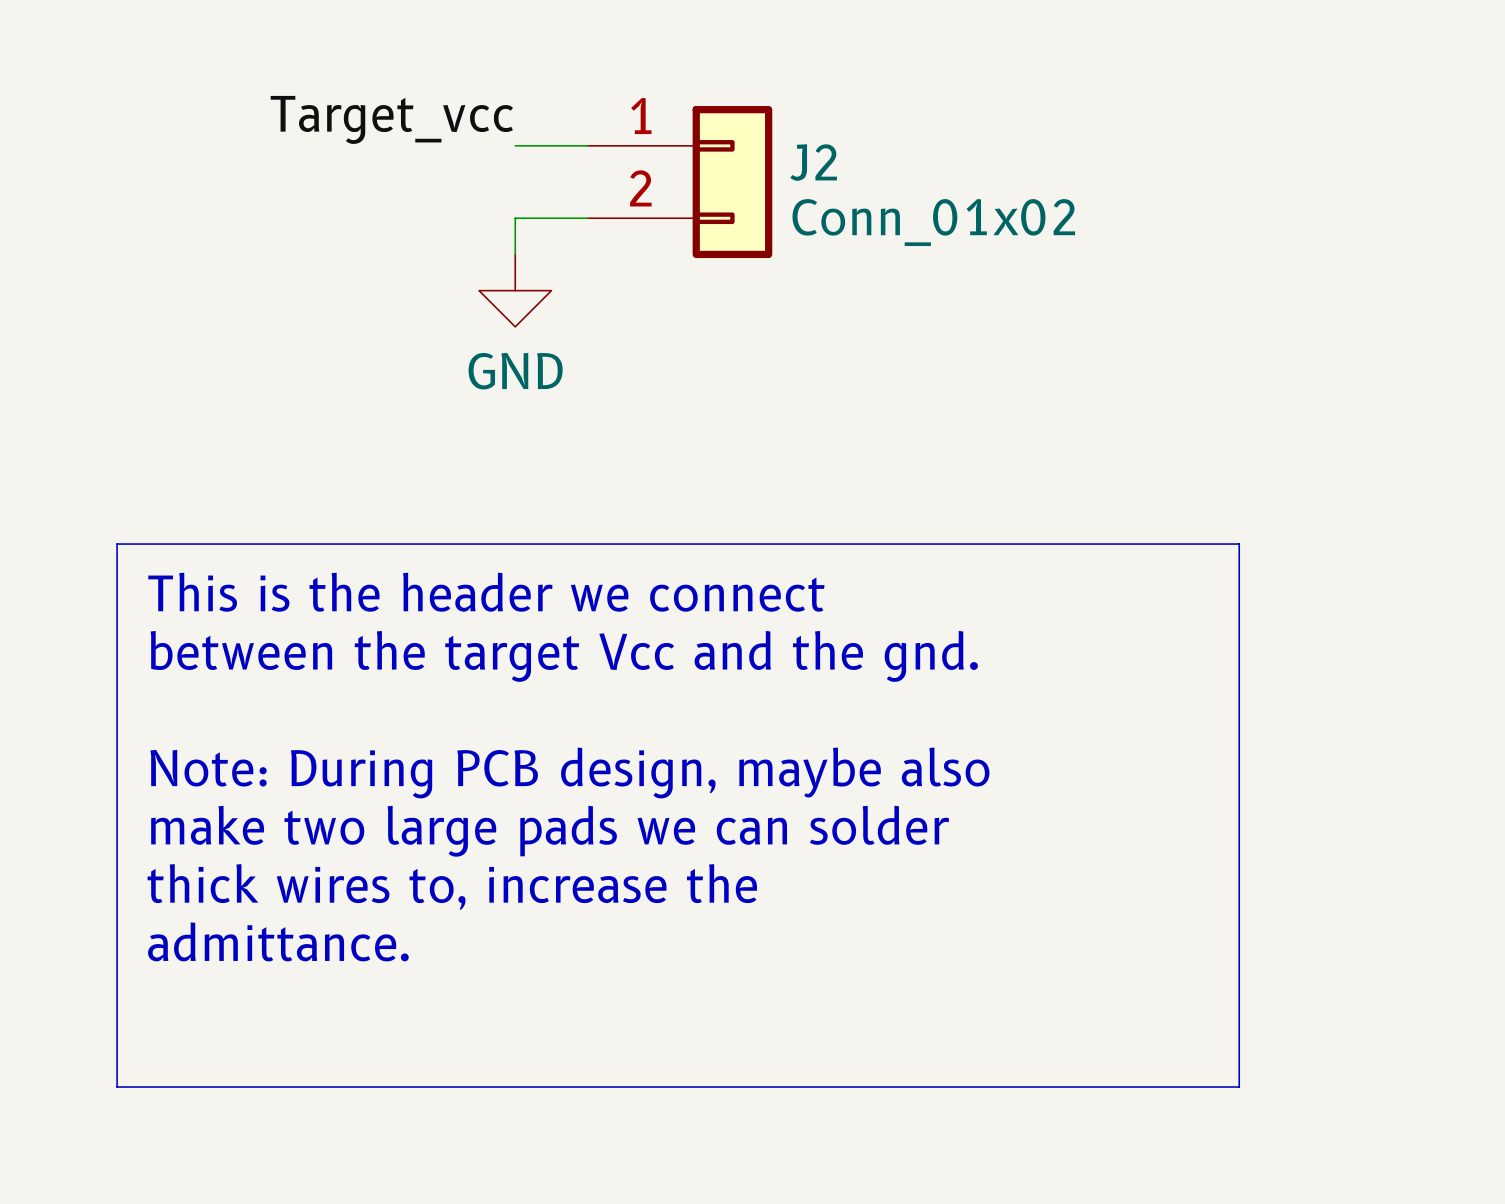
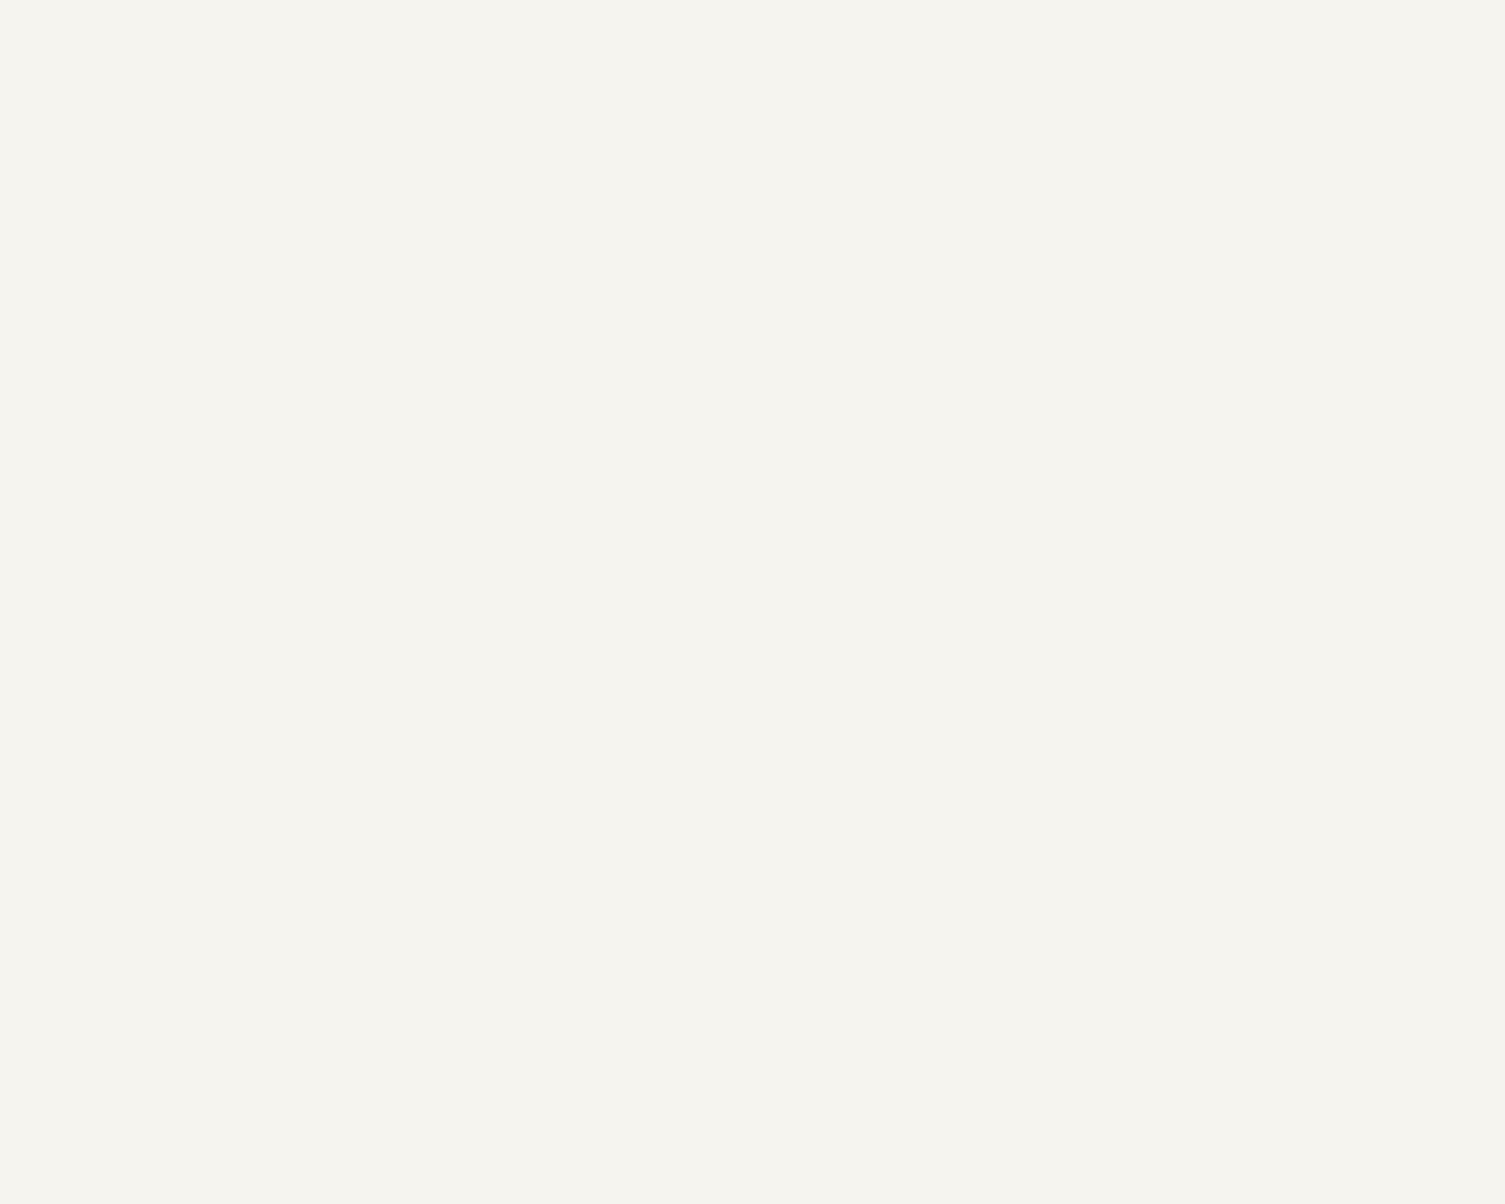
label: Target_vcc (391, 119) -> none
wire: (515, 145) (587, 145) -> none
J2: Conn_01x02 (679, 182) -> none
wire: (587, 218) (515, 218) (515, 254) -> none
power symbol: GND (515, 290) -> none
line: (117, 544) (1239, 544) (1239, 1087) (117, 1087) (117, 544) -> none
text: This is the header we connect (486, 592) -> none
text: between the target Vcc and the gnd. (564, 656) -> none
text: Note: During PCB design, maybe also (569, 772) -> none
text: make two large pads we can solder (550, 831) -> none
text: thick wires to, increase the (452, 886) -> none
text: admittance. (278, 941) -> none

